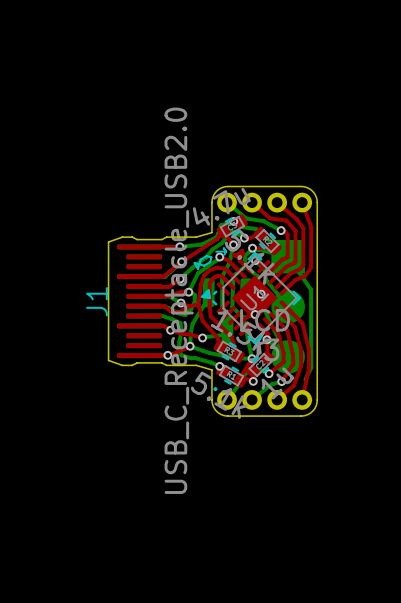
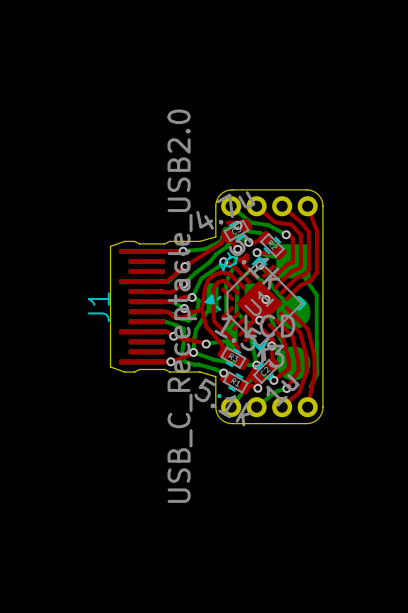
top track: none -> (242, 222) (227, 222)
bottom track: (252, 249) (245, 255) (245, 266) -> none
line: (226, 251) (216, 251) -> none
line: (206, 256) (211, 257) (210, 262) (204, 265) (194, 263) (198, 269) (200, 259) (206, 256) -> (232, 256) (237, 258) (235, 263) (229, 266) (219, 264) (223, 270) (226, 260) (232, 256)

